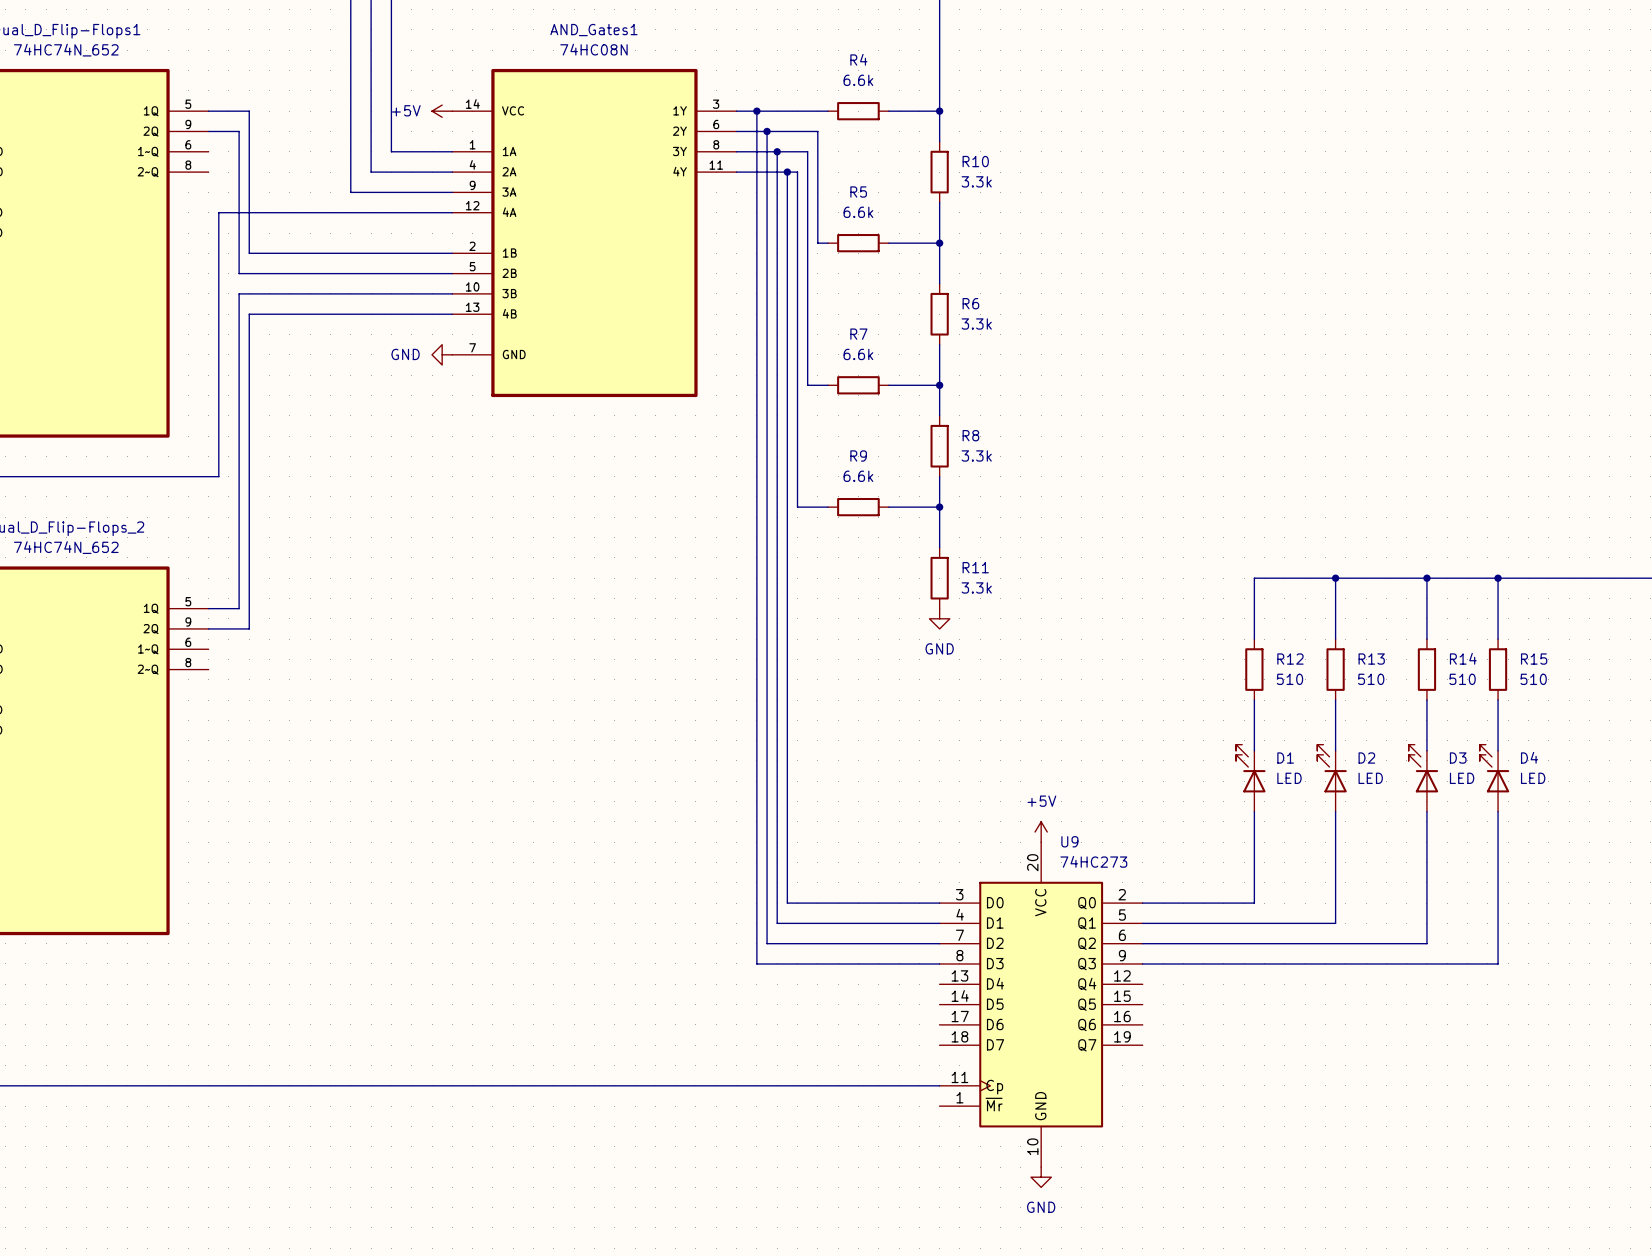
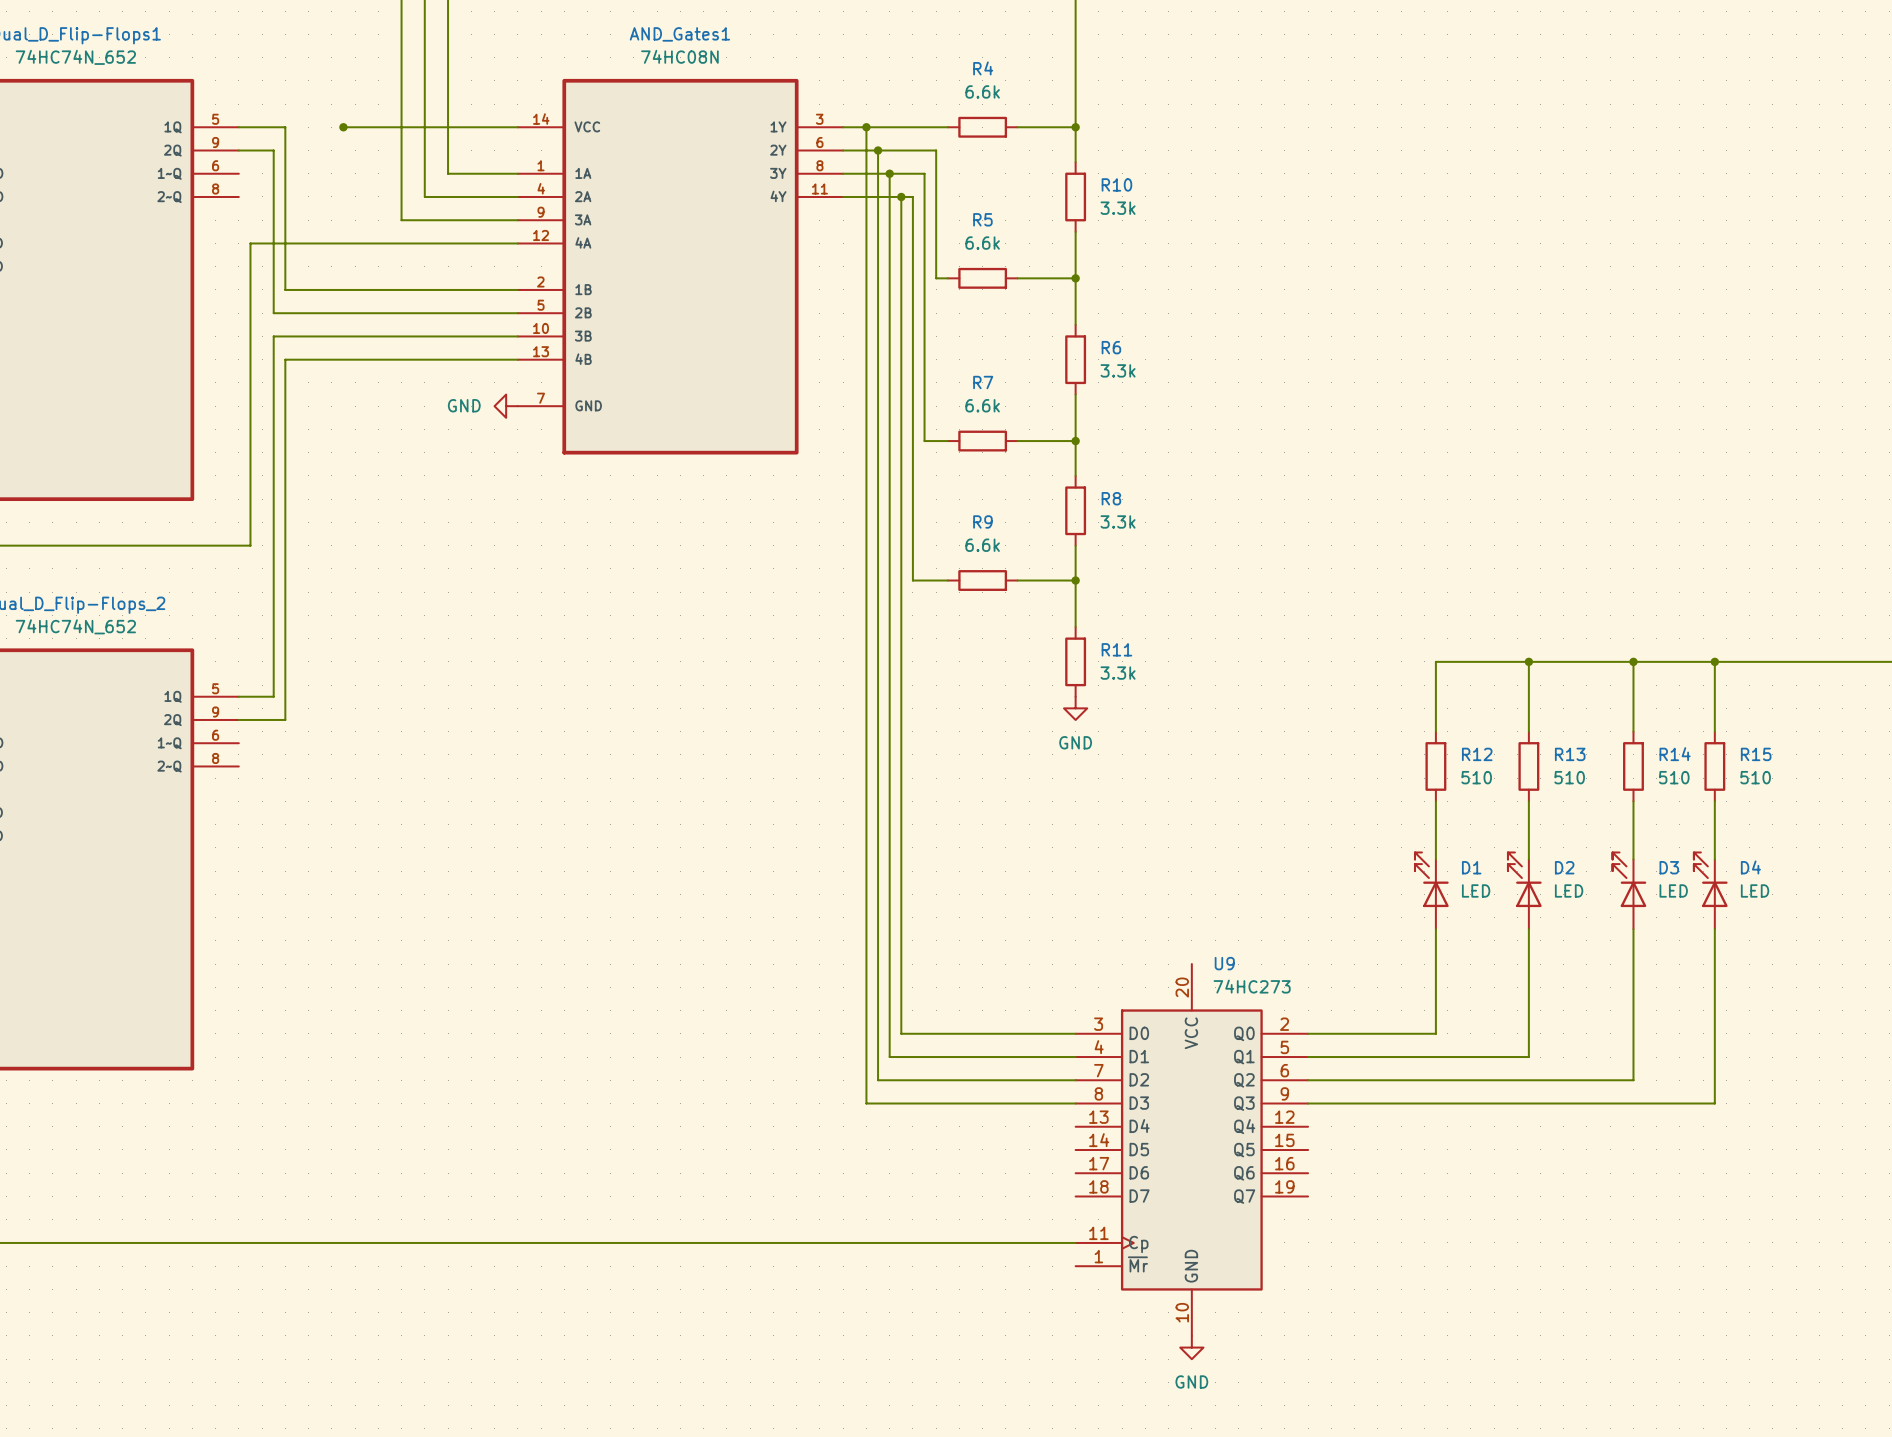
wire: none -> (343, 127) (517, 127)
junction: none -> (343, 127)
power symbol: +5V (442, 111) -> none
power symbol: +5V (1041, 832) -> none

